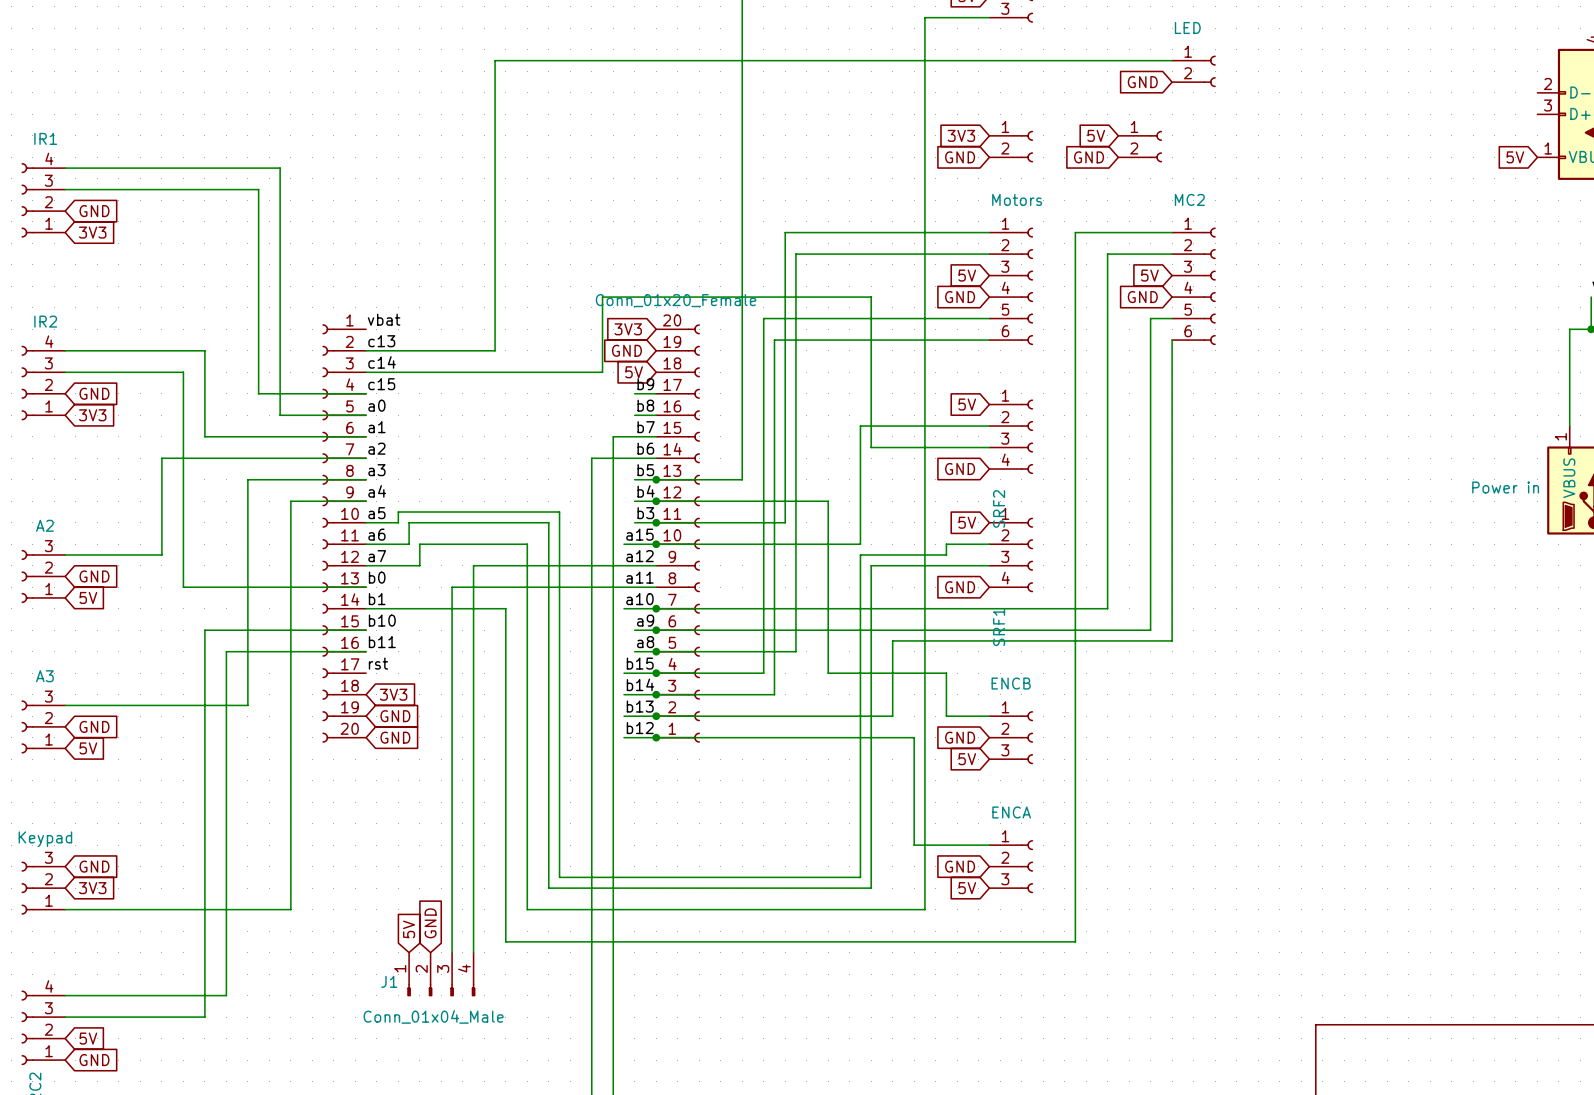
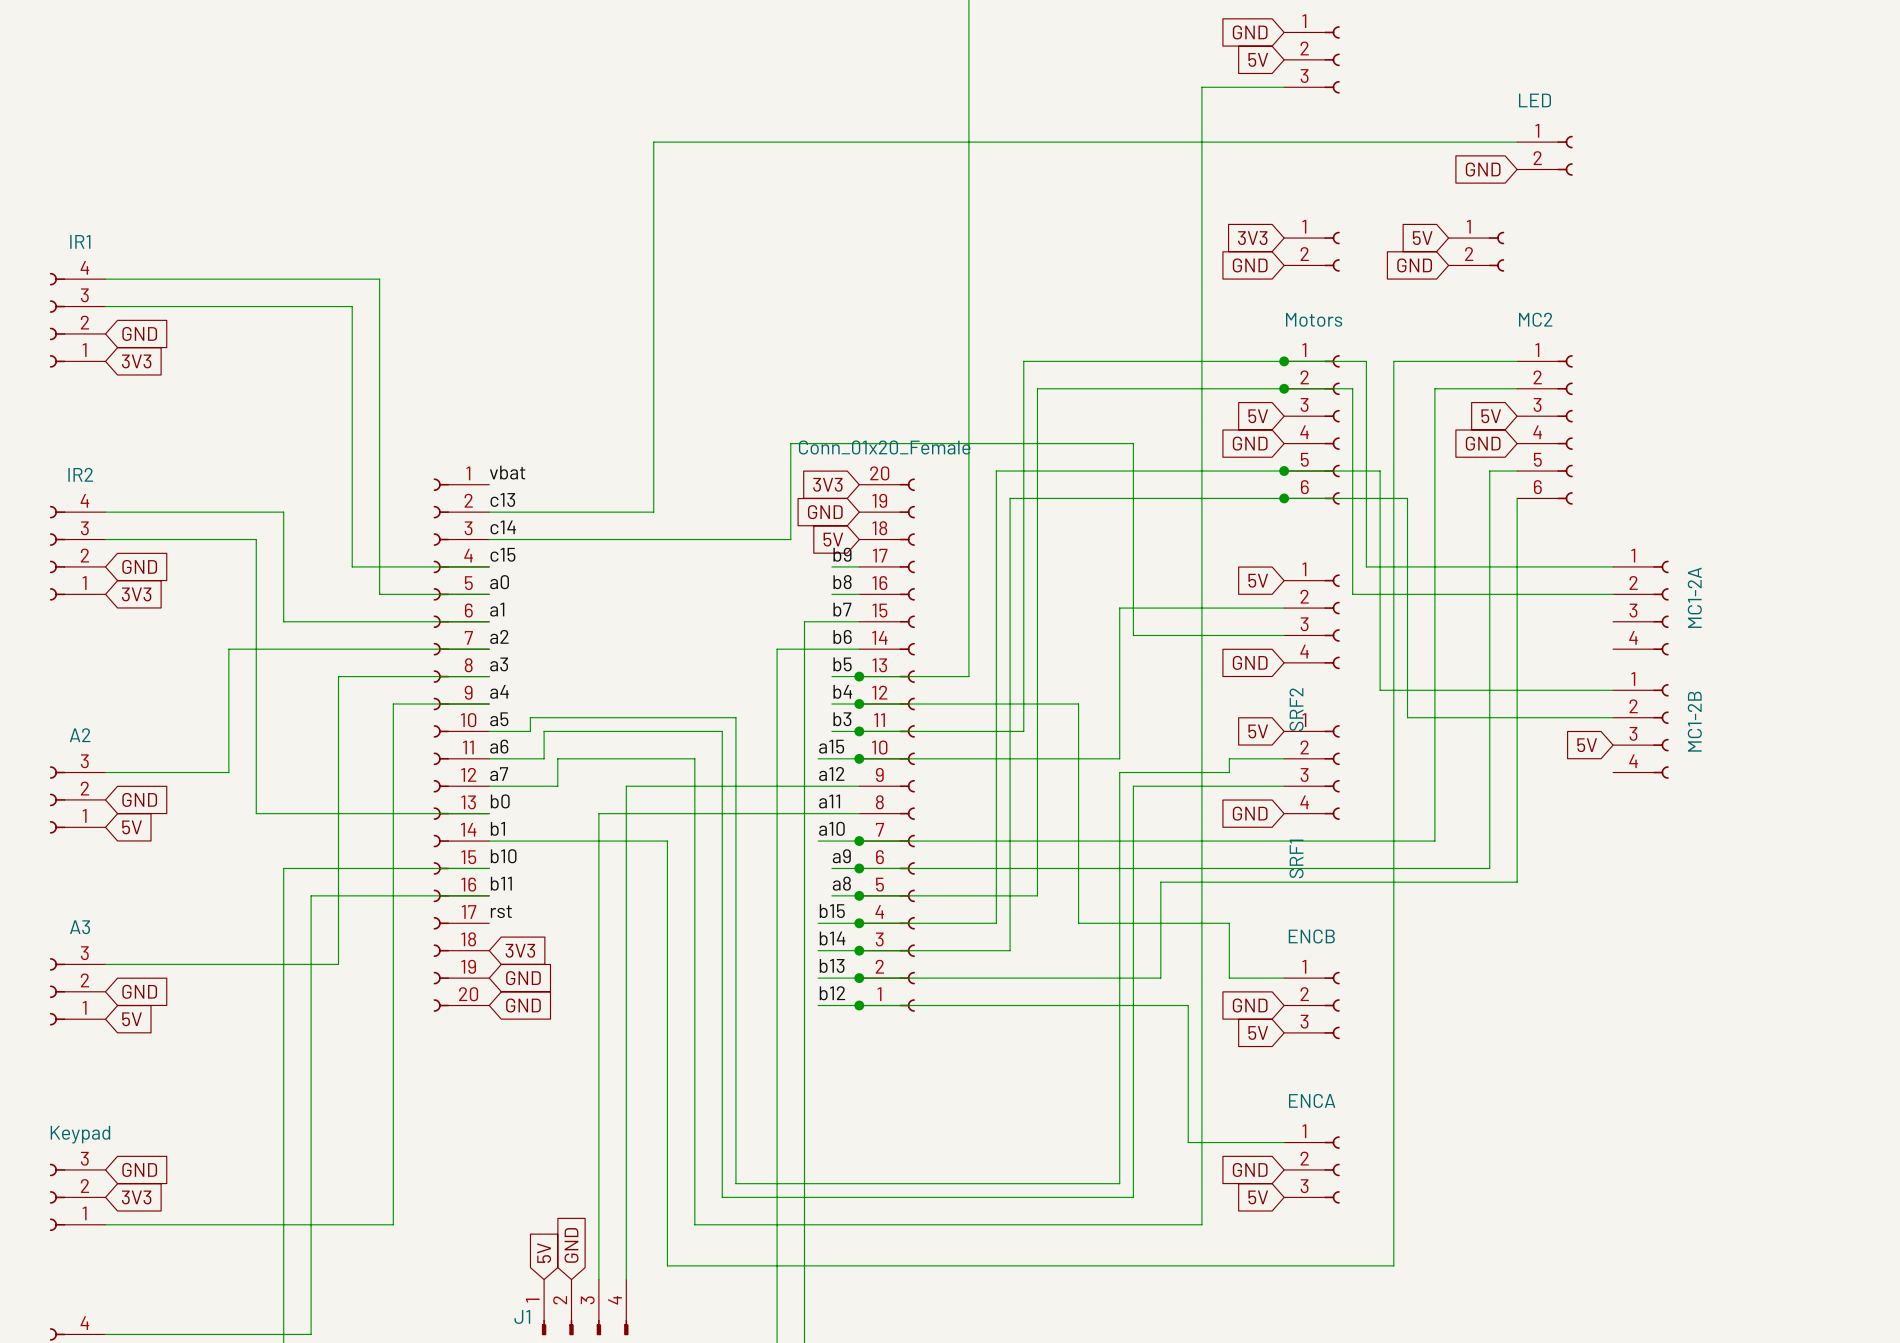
wire: none -> (1284, 361) (1366, 361) (1366, 566) (1613, 566)
junction: none -> (1284, 361)
wire: none -> (1284, 388) (1352, 388) (1352, 594) (1613, 594)
junction: none -> (1284, 388)
wire: none -> (1284, 471) (1380, 471) (1380, 690) (1613, 690)
junction: none -> (1284, 471)
wire: none -> (1284, 498) (1407, 498) (1407, 717) (1613, 717)
junction: none -> (1284, 498)
part: none -> MC1-2A (1640, 608)
part: none -> MC1-2B (1640, 731)
global label: none -> 5V (1587, 745)

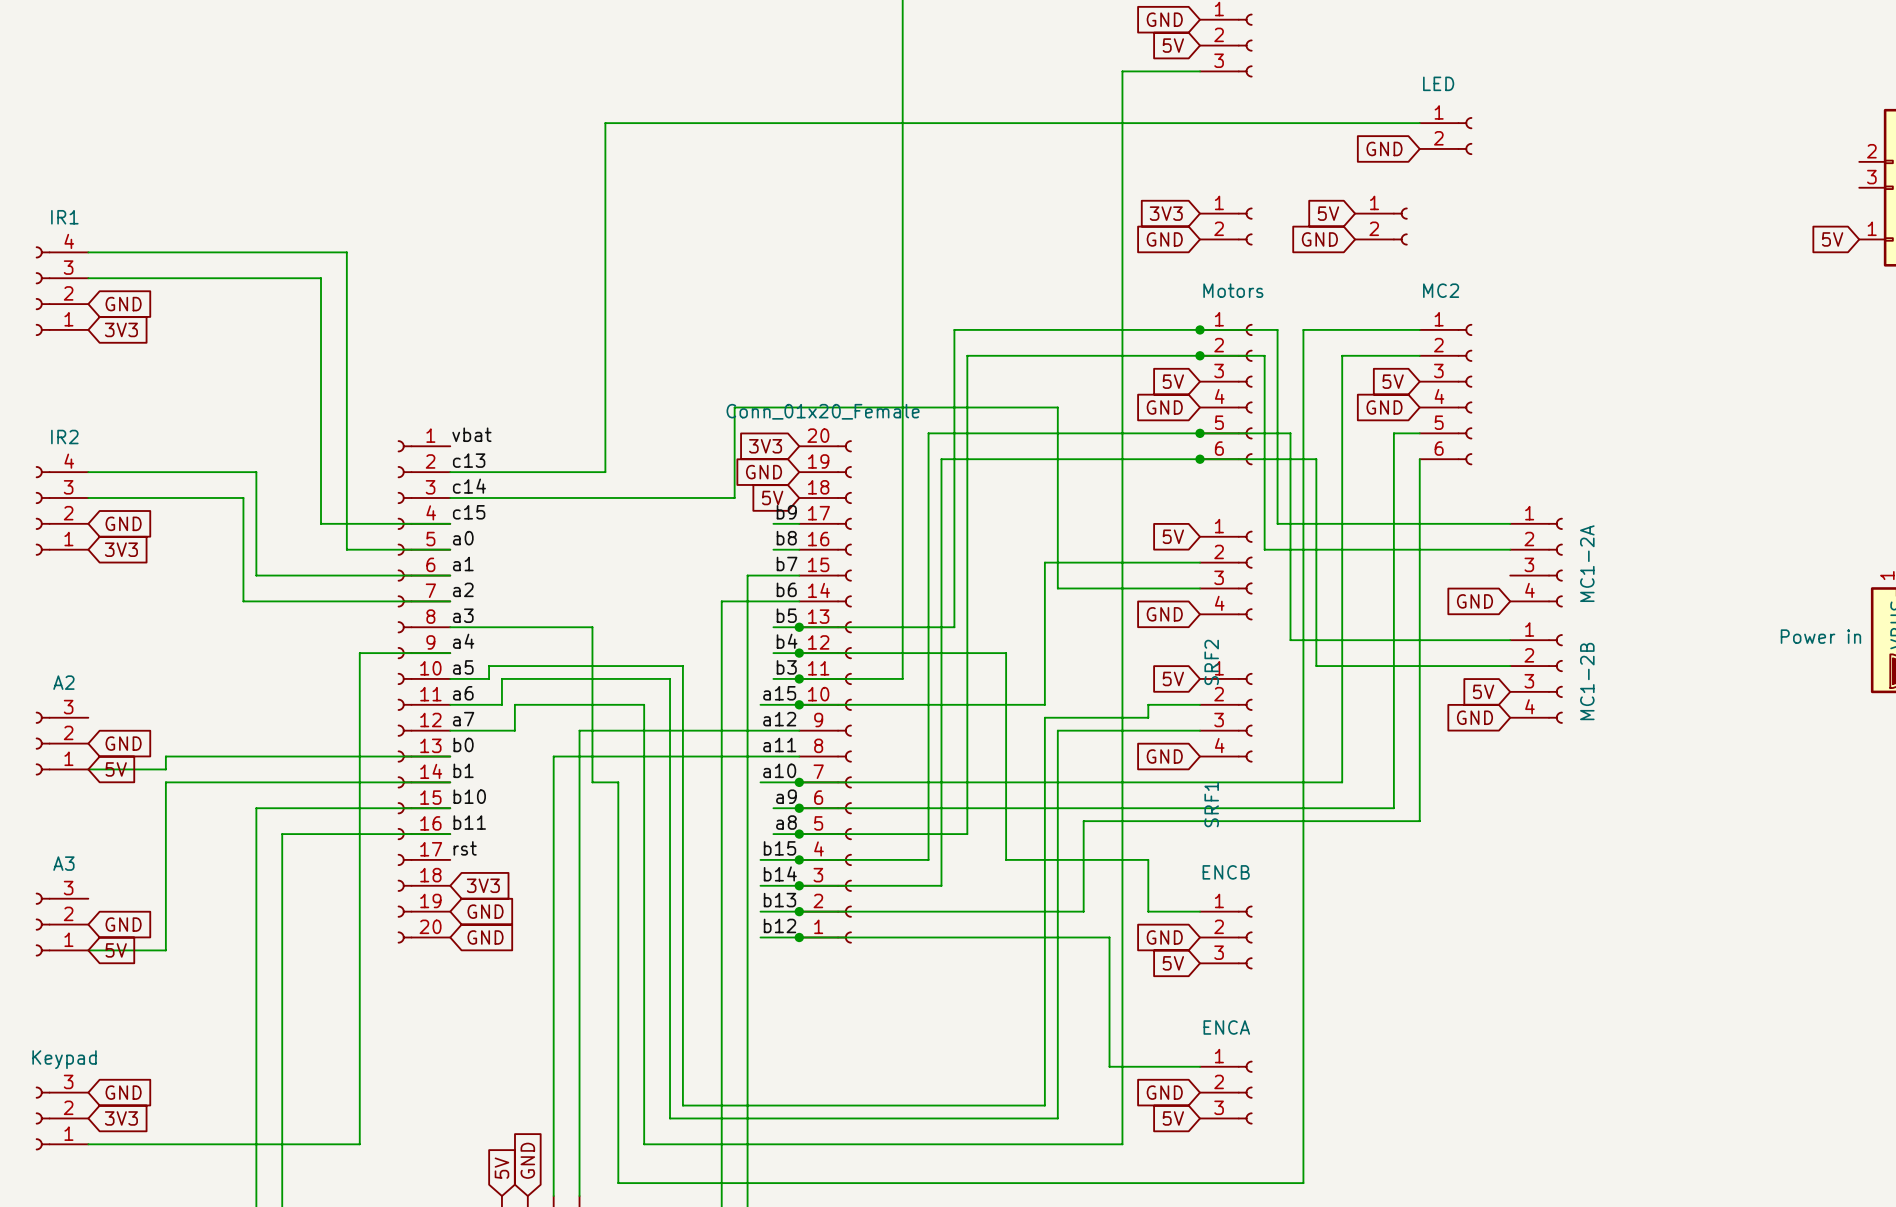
wire: (256, 539) (256, 813) -> (230, 497) (243, 497) (243, 601)
wire: (269, 649) (228, 649) (228, 772) (105, 772) -> none
global label: none -> GND (1474, 601)
wire: (489, 676) (338, 676) (338, 964) (105, 964) -> none
wire: (1023, 676) (1023, 731) (968, 731) -> (954, 627) (902, 627) (902, 678)
global label: none -> GND (1474, 717)
wire: none -> (230, 756) (165, 756) (165, 769) (88, 769)
wire: (489, 841) (640, 841) -> (450, 627) (592, 627) (592, 782)
wire: none -> (450, 782) (165, 782) (165, 950) (88, 950)

